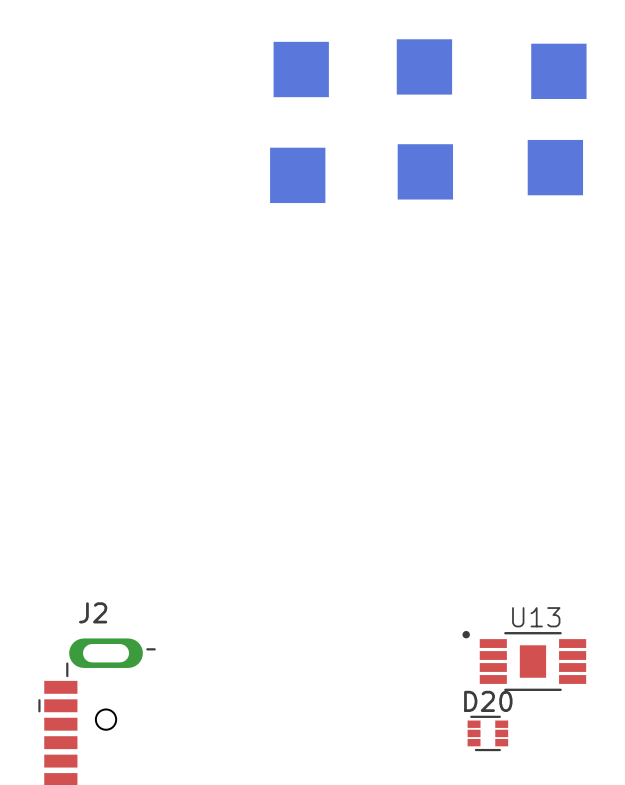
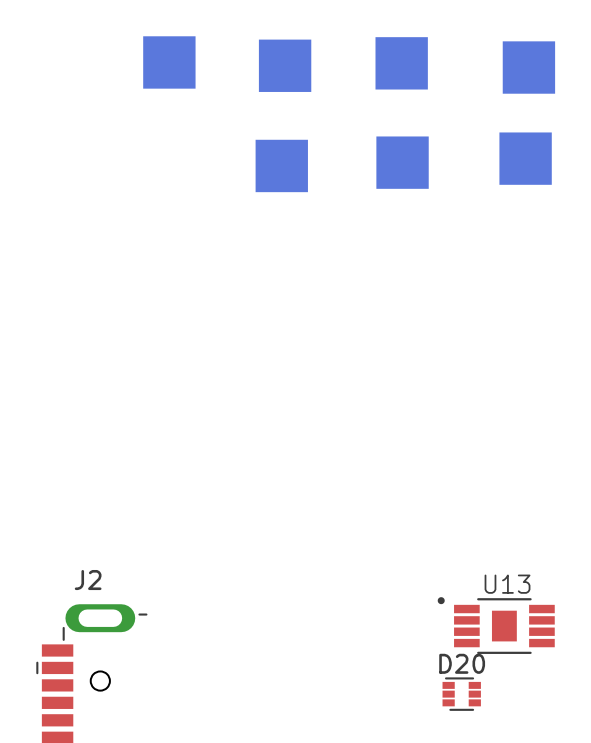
part: none -> (169, 62)

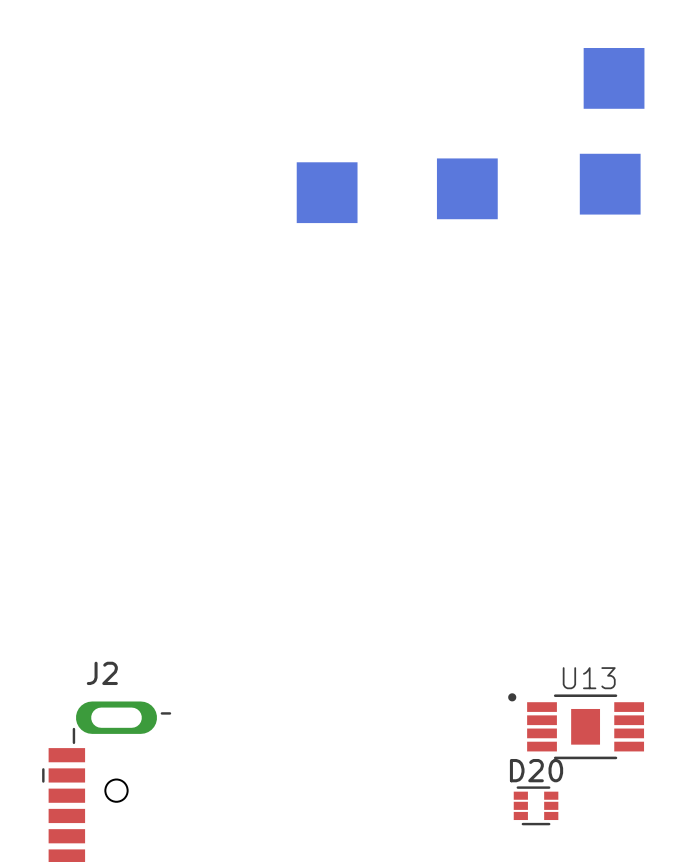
part: (169, 62) -> none
part: (401, 63) -> none
part: (285, 65) -> none

